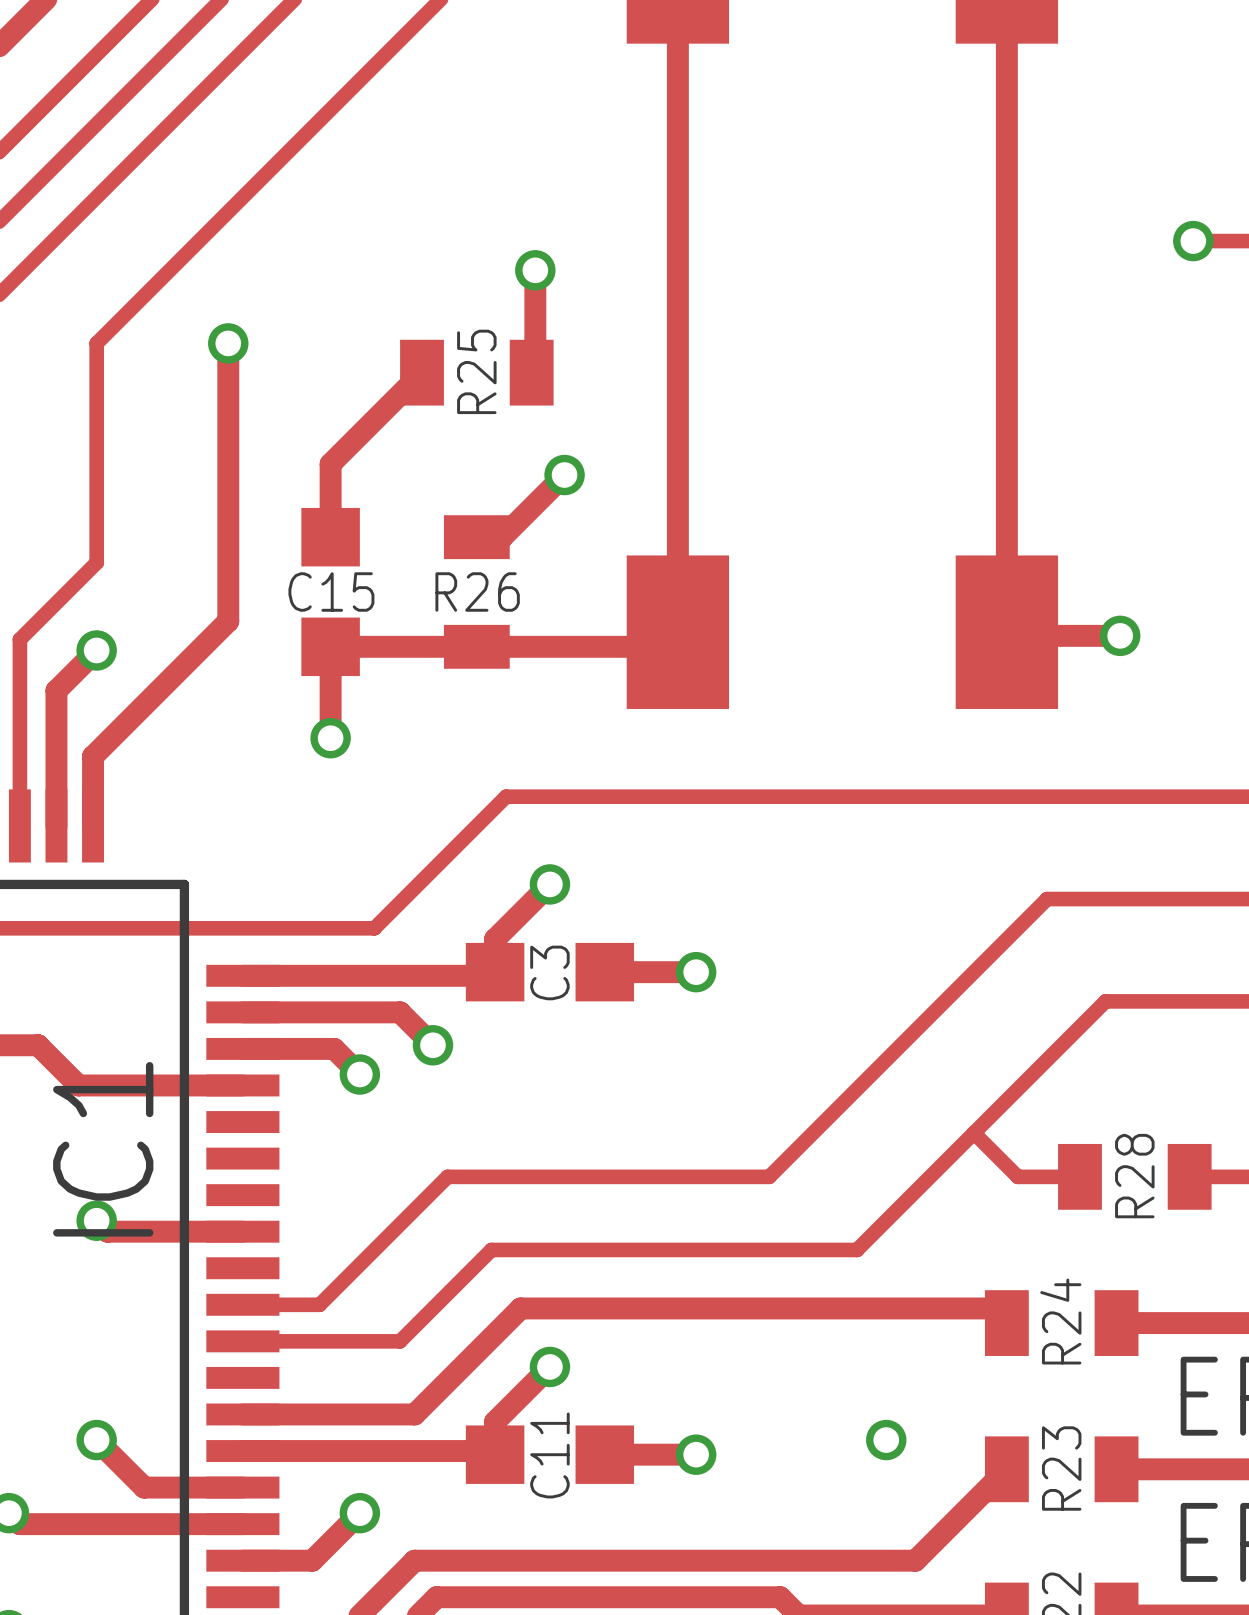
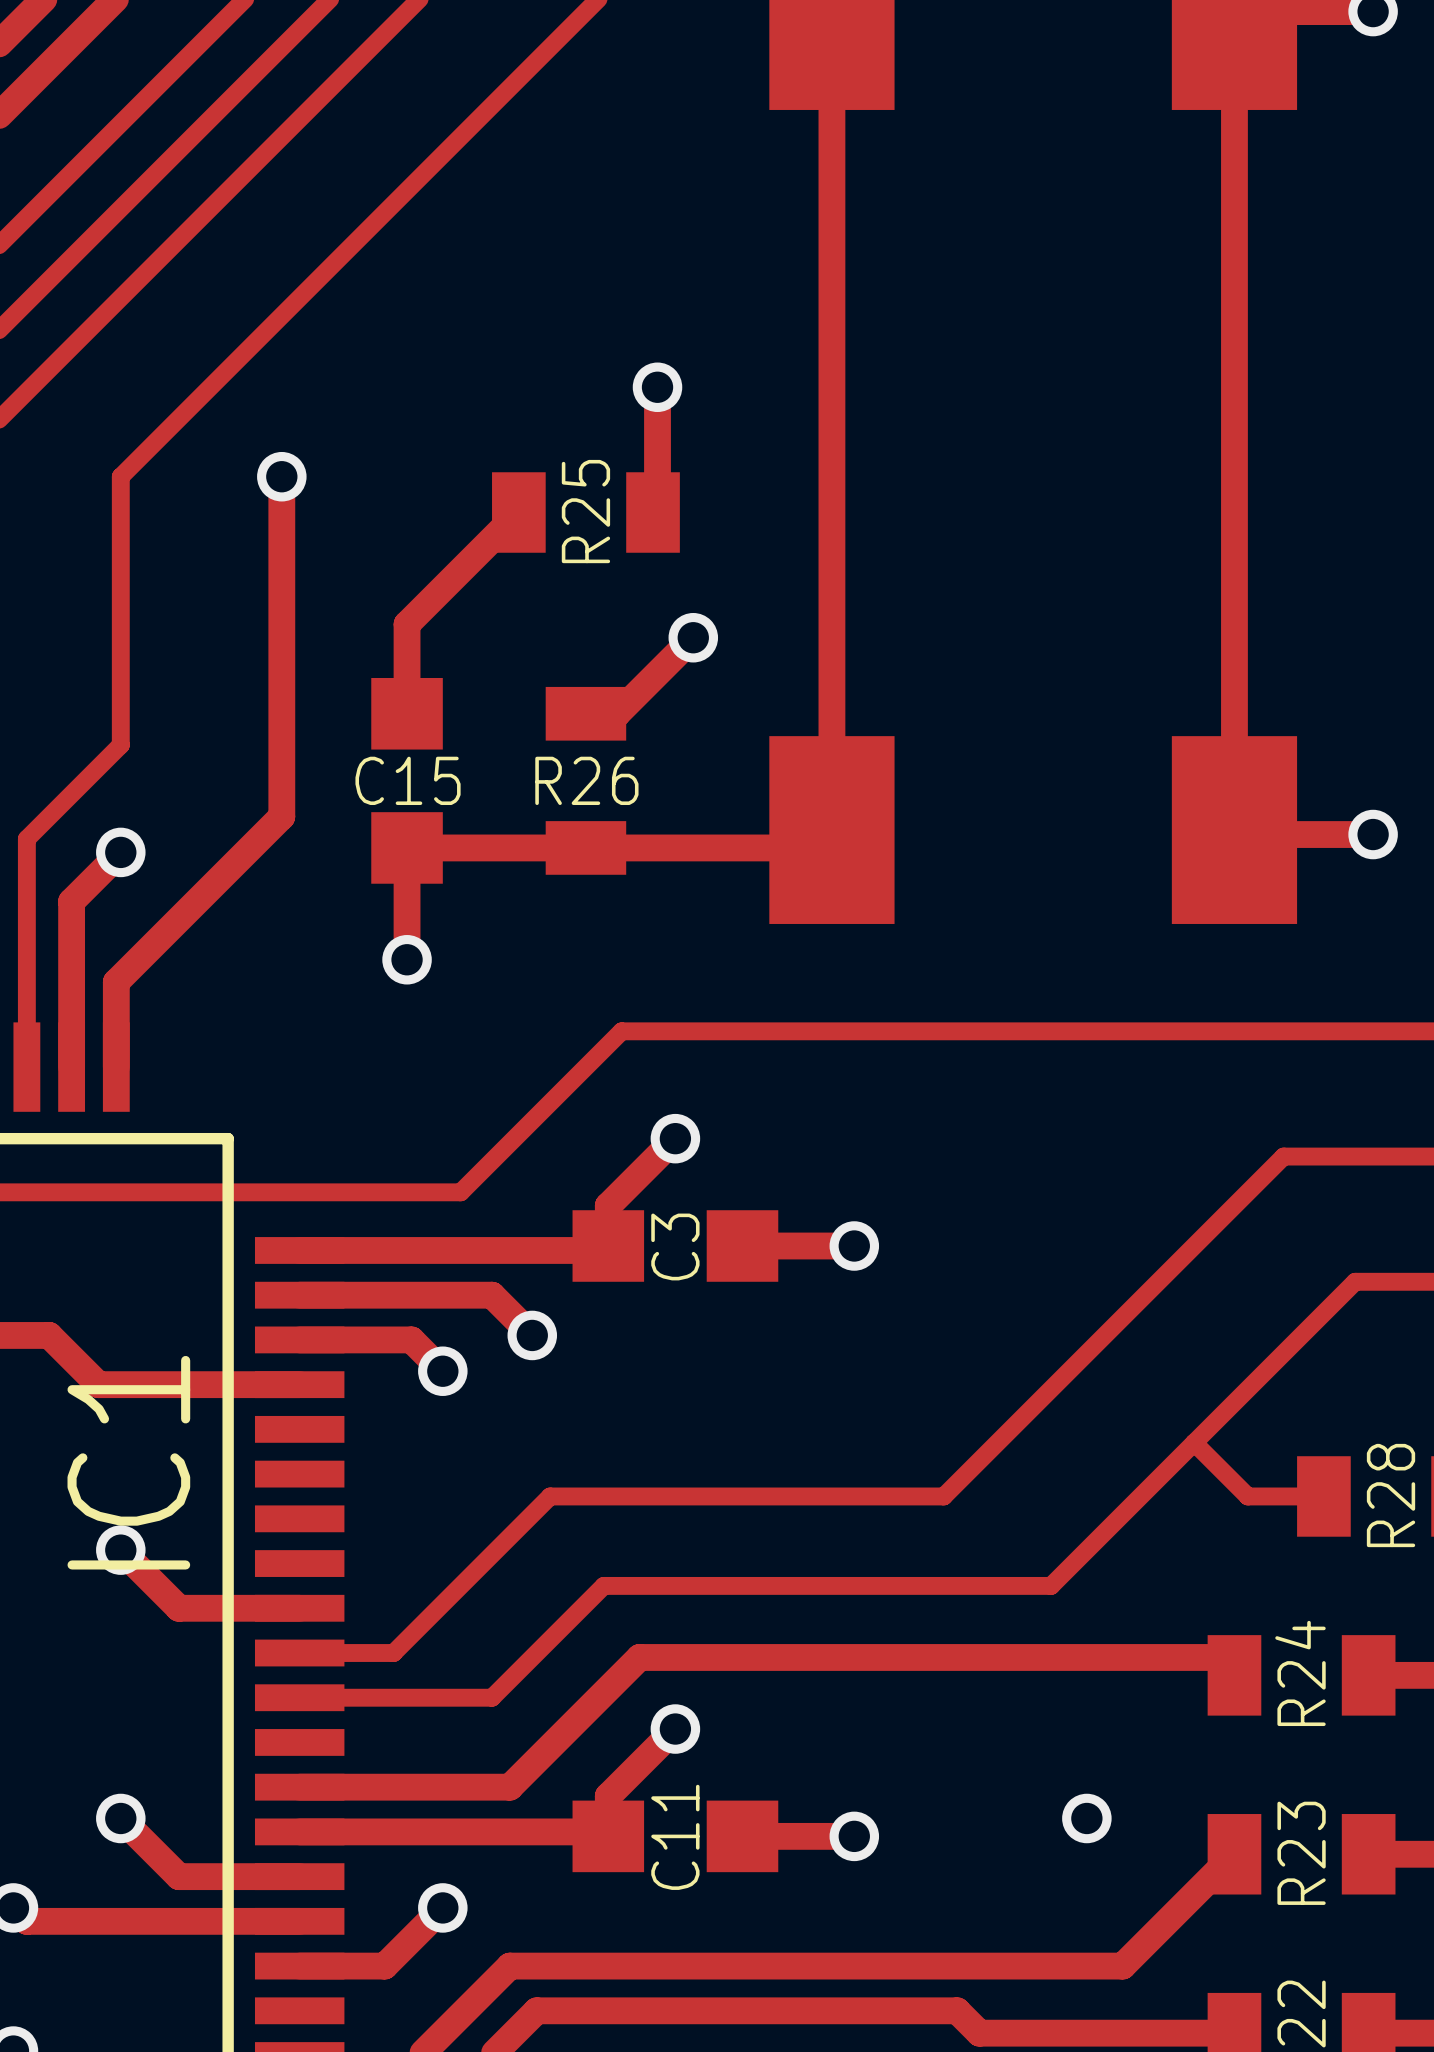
track: (107, 1231) (242, 1231) -> (134, 1563) (178, 1608) (299, 1608)

